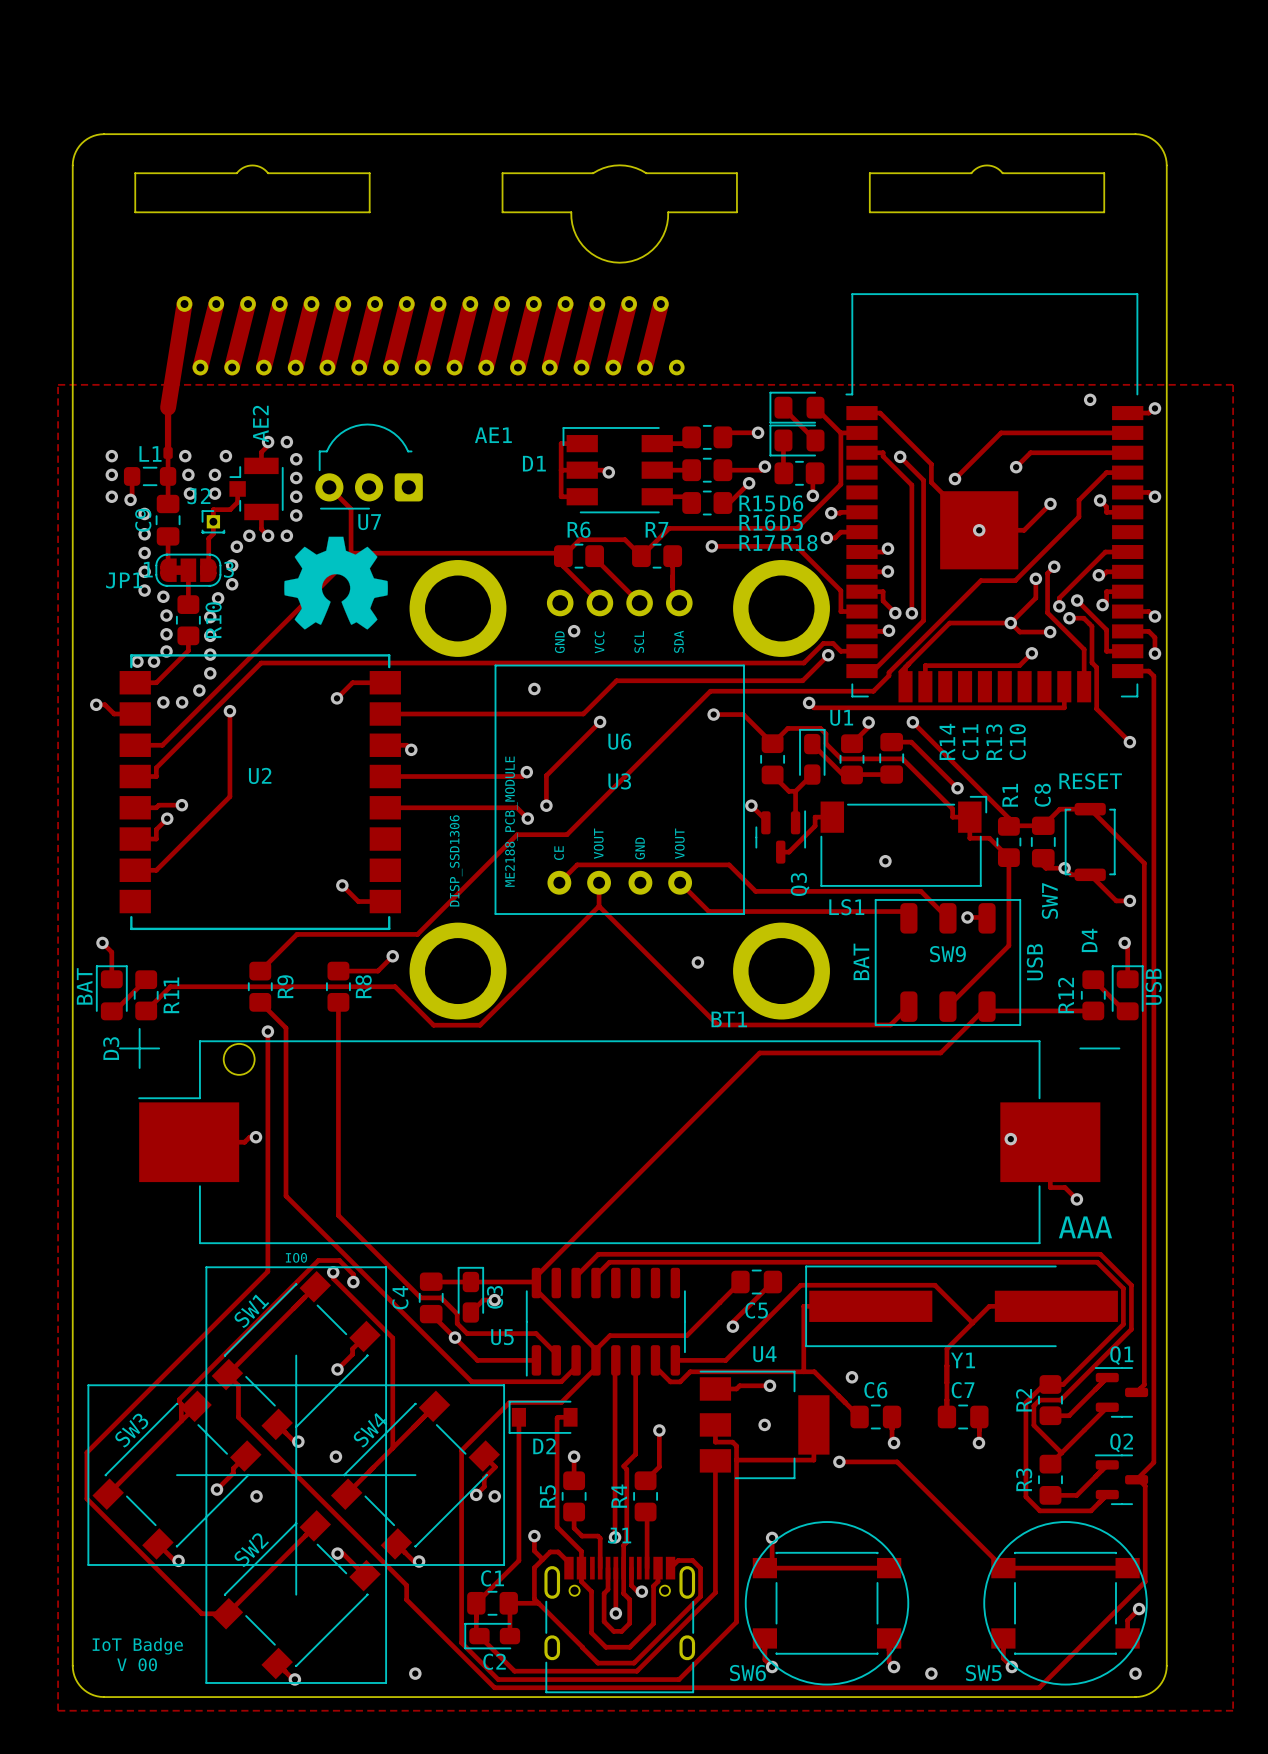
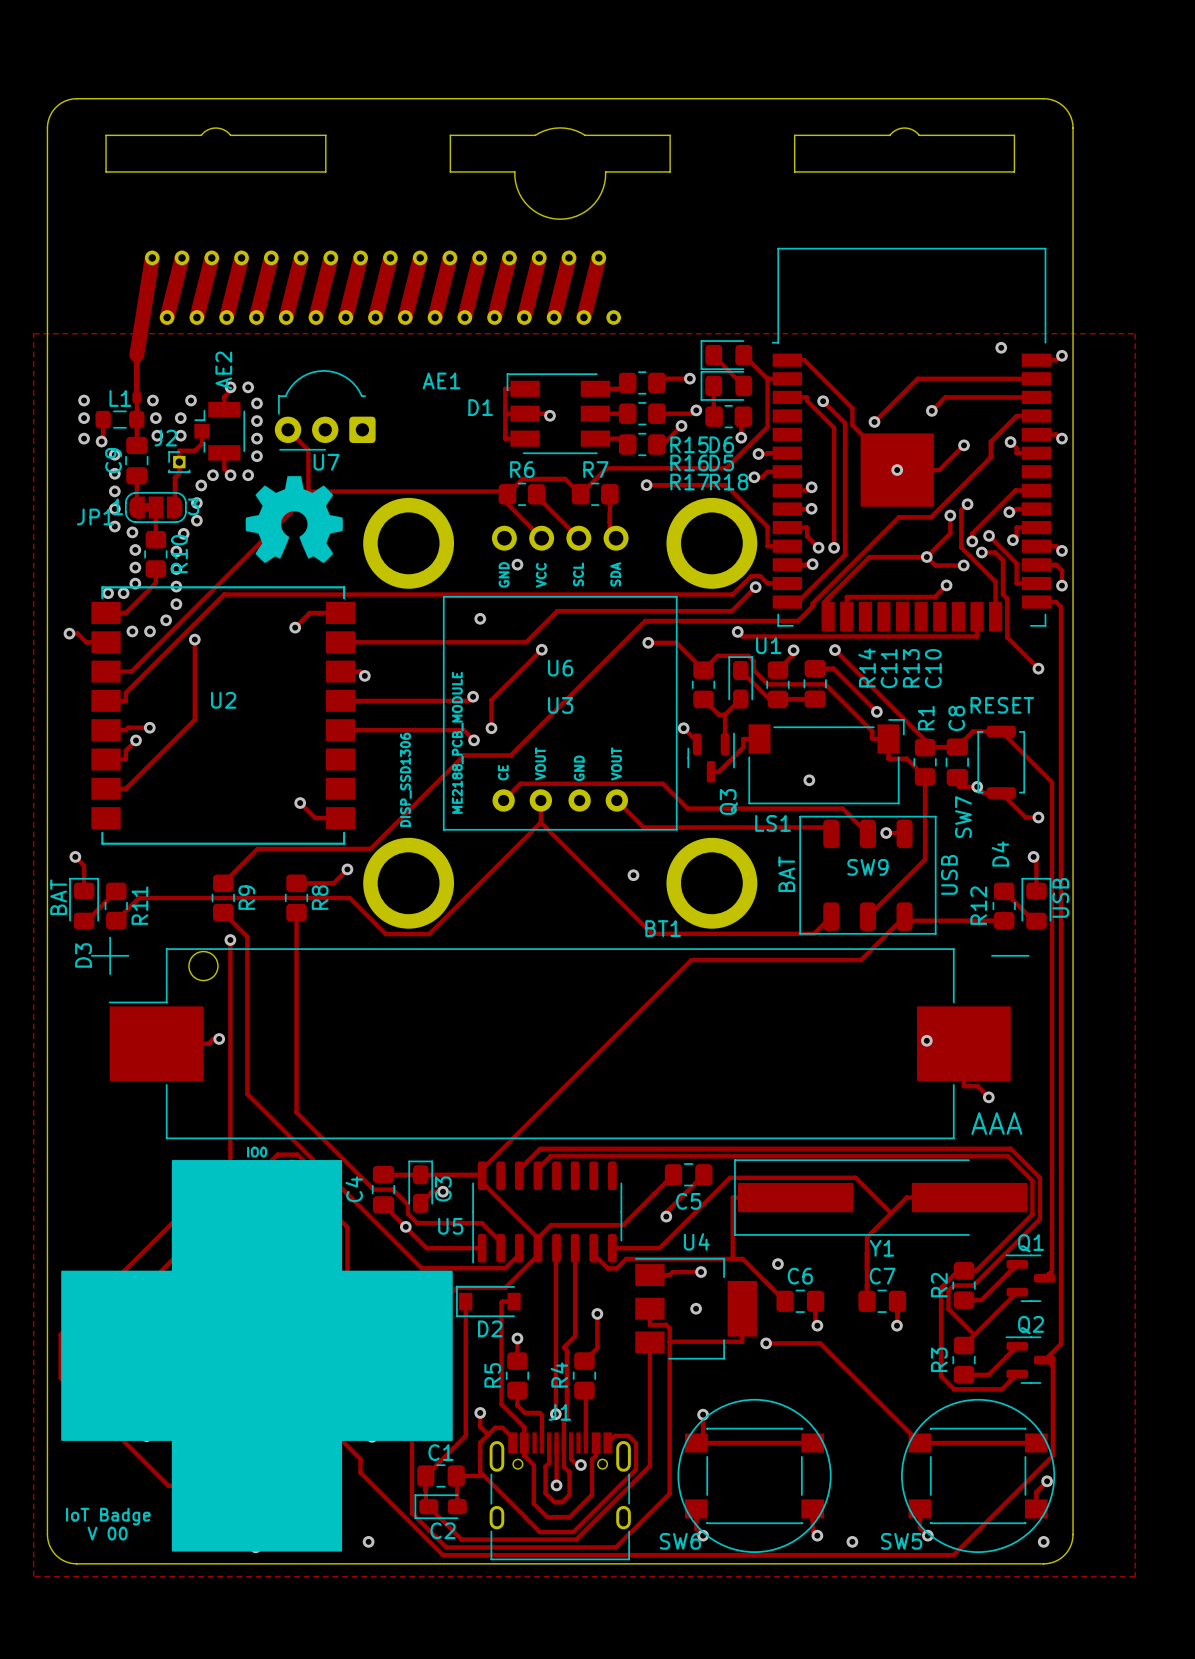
drawing: none -> [61, 1160, 453, 1552]
line: (206, 1267) (386, 1267) (386, 1682) (206, 1682) (206, 1267) -> none
line: (88, 1385) (504, 1385) (504, 1564) (88, 1564) (88, 1385) -> none

